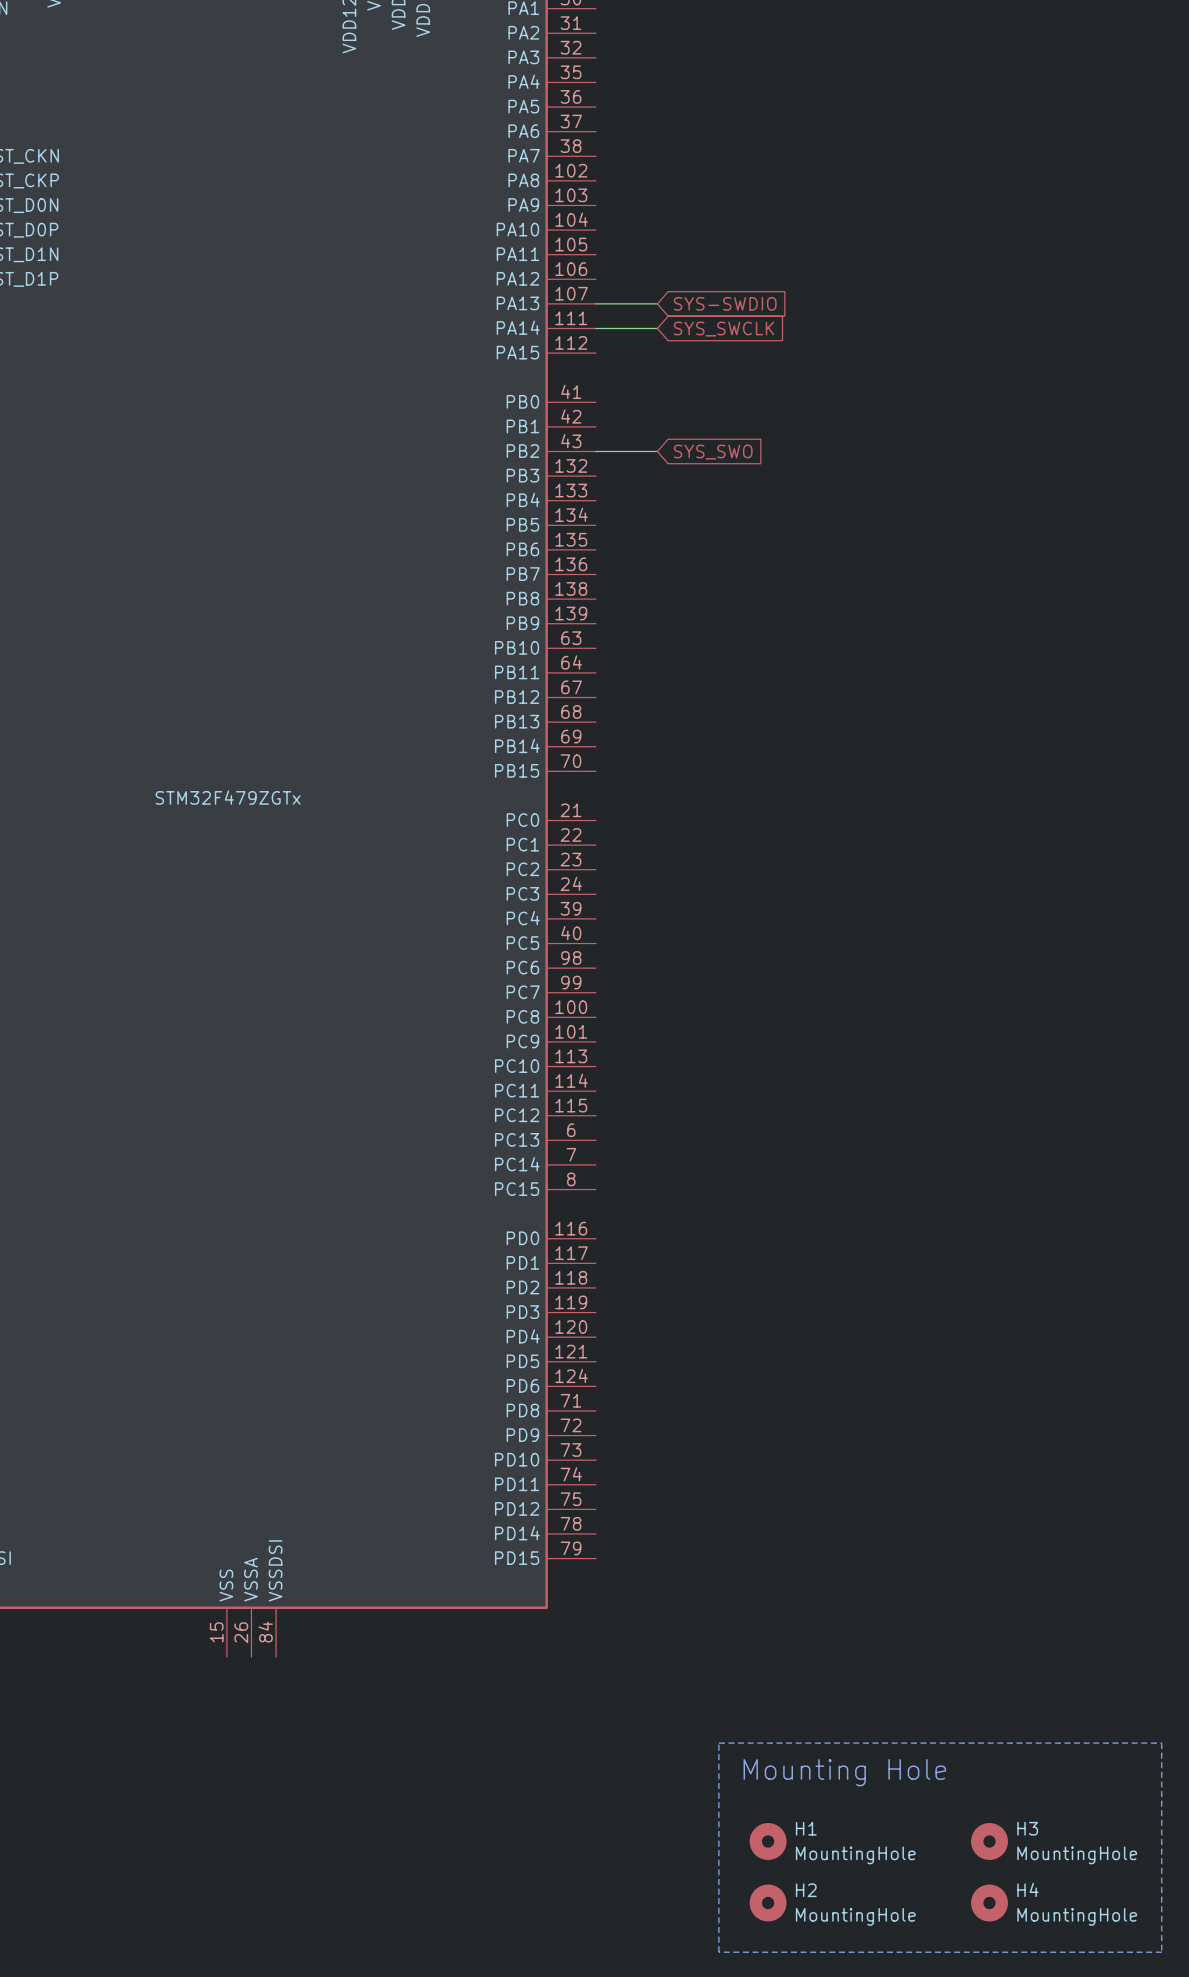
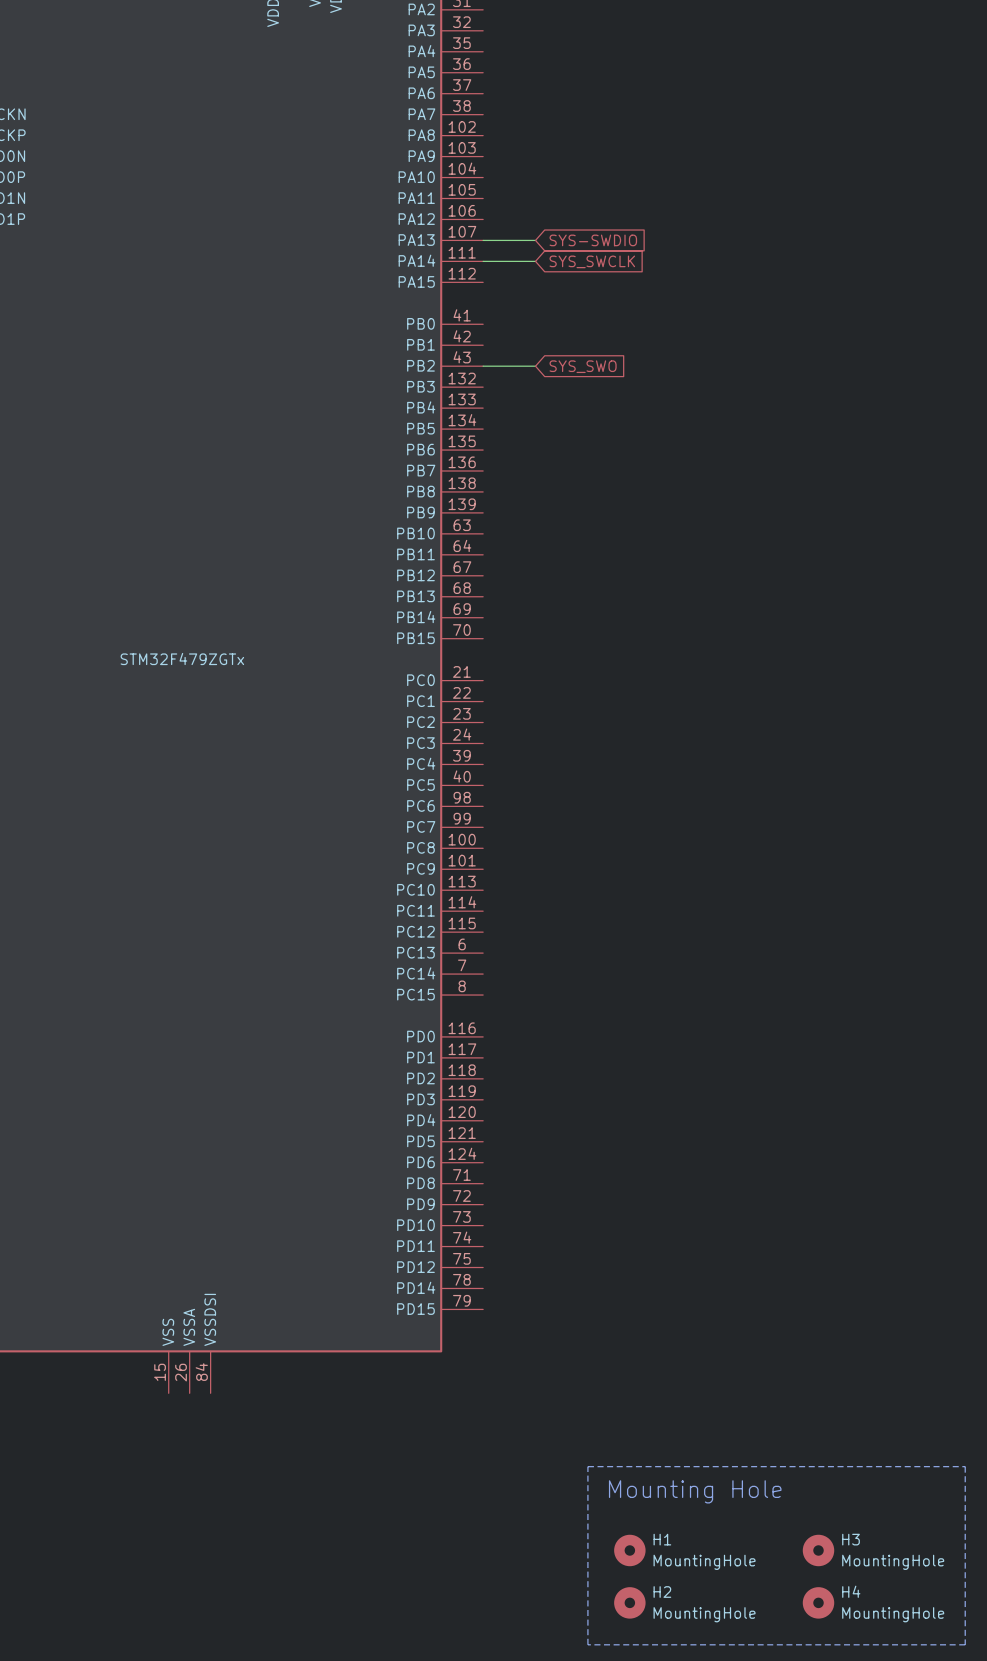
part value position: STM32F479ZGTx (228, 797) -> STM32F479ZGTx (182, 659)

